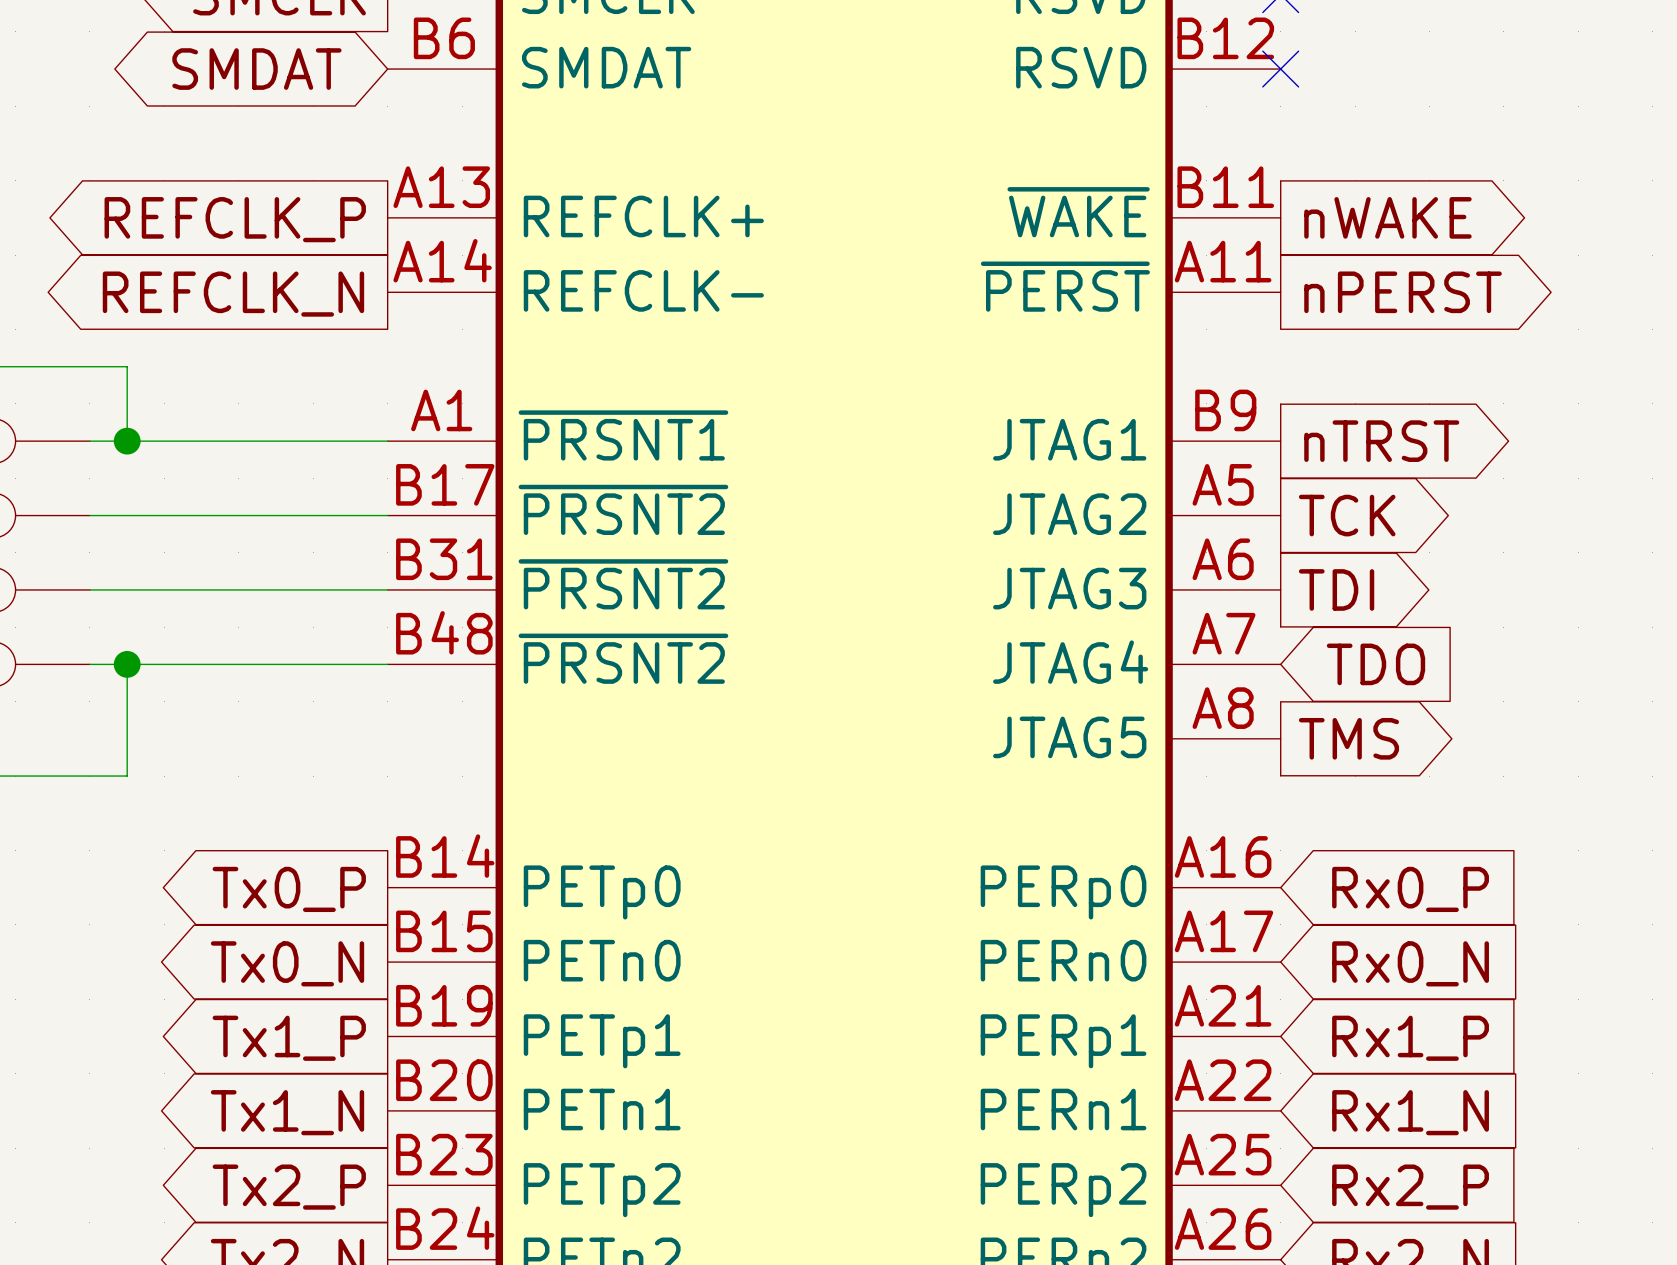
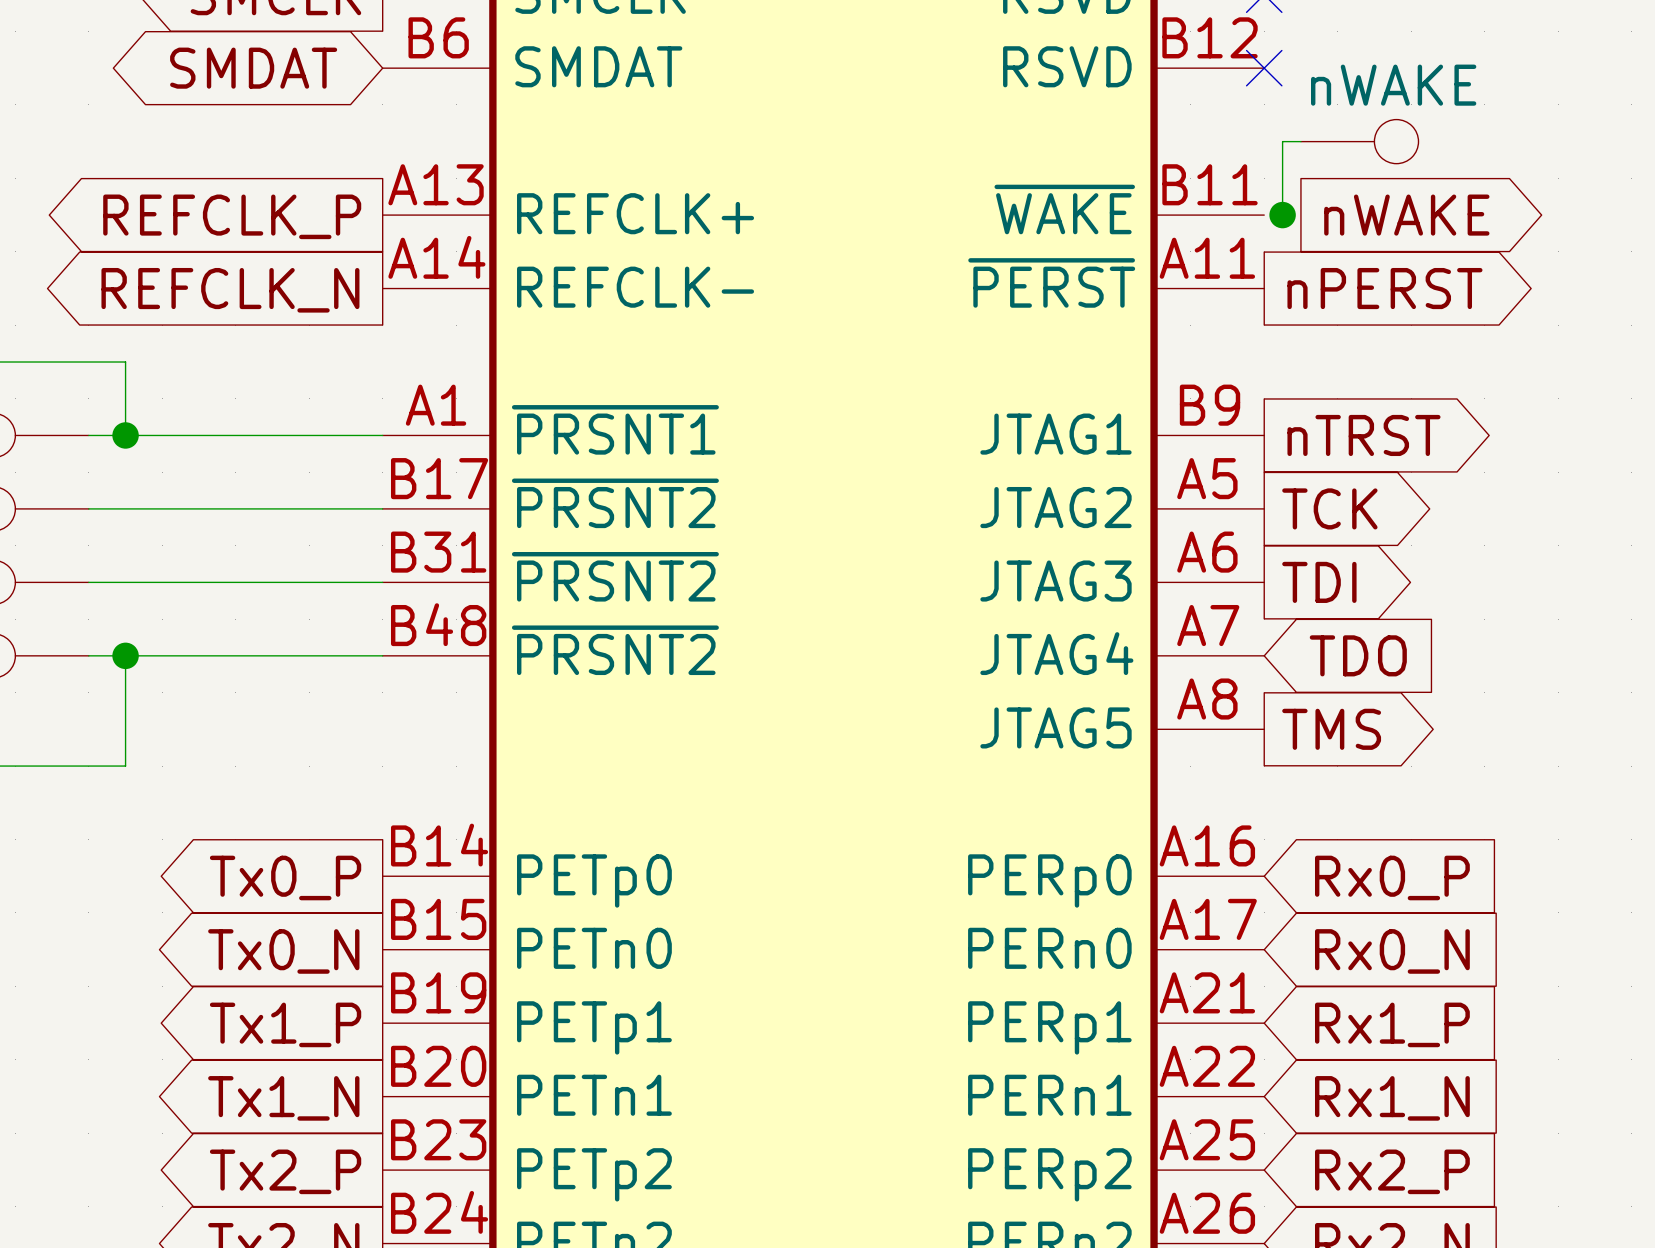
wire: none -> (1300, 141) (1282, 141) (1282, 215)
part: none -> nWAKE (1359, 141)
junction: none -> (1282, 215)
global label position: nWAKE (1387, 217) -> nWAKE (1406, 215)

